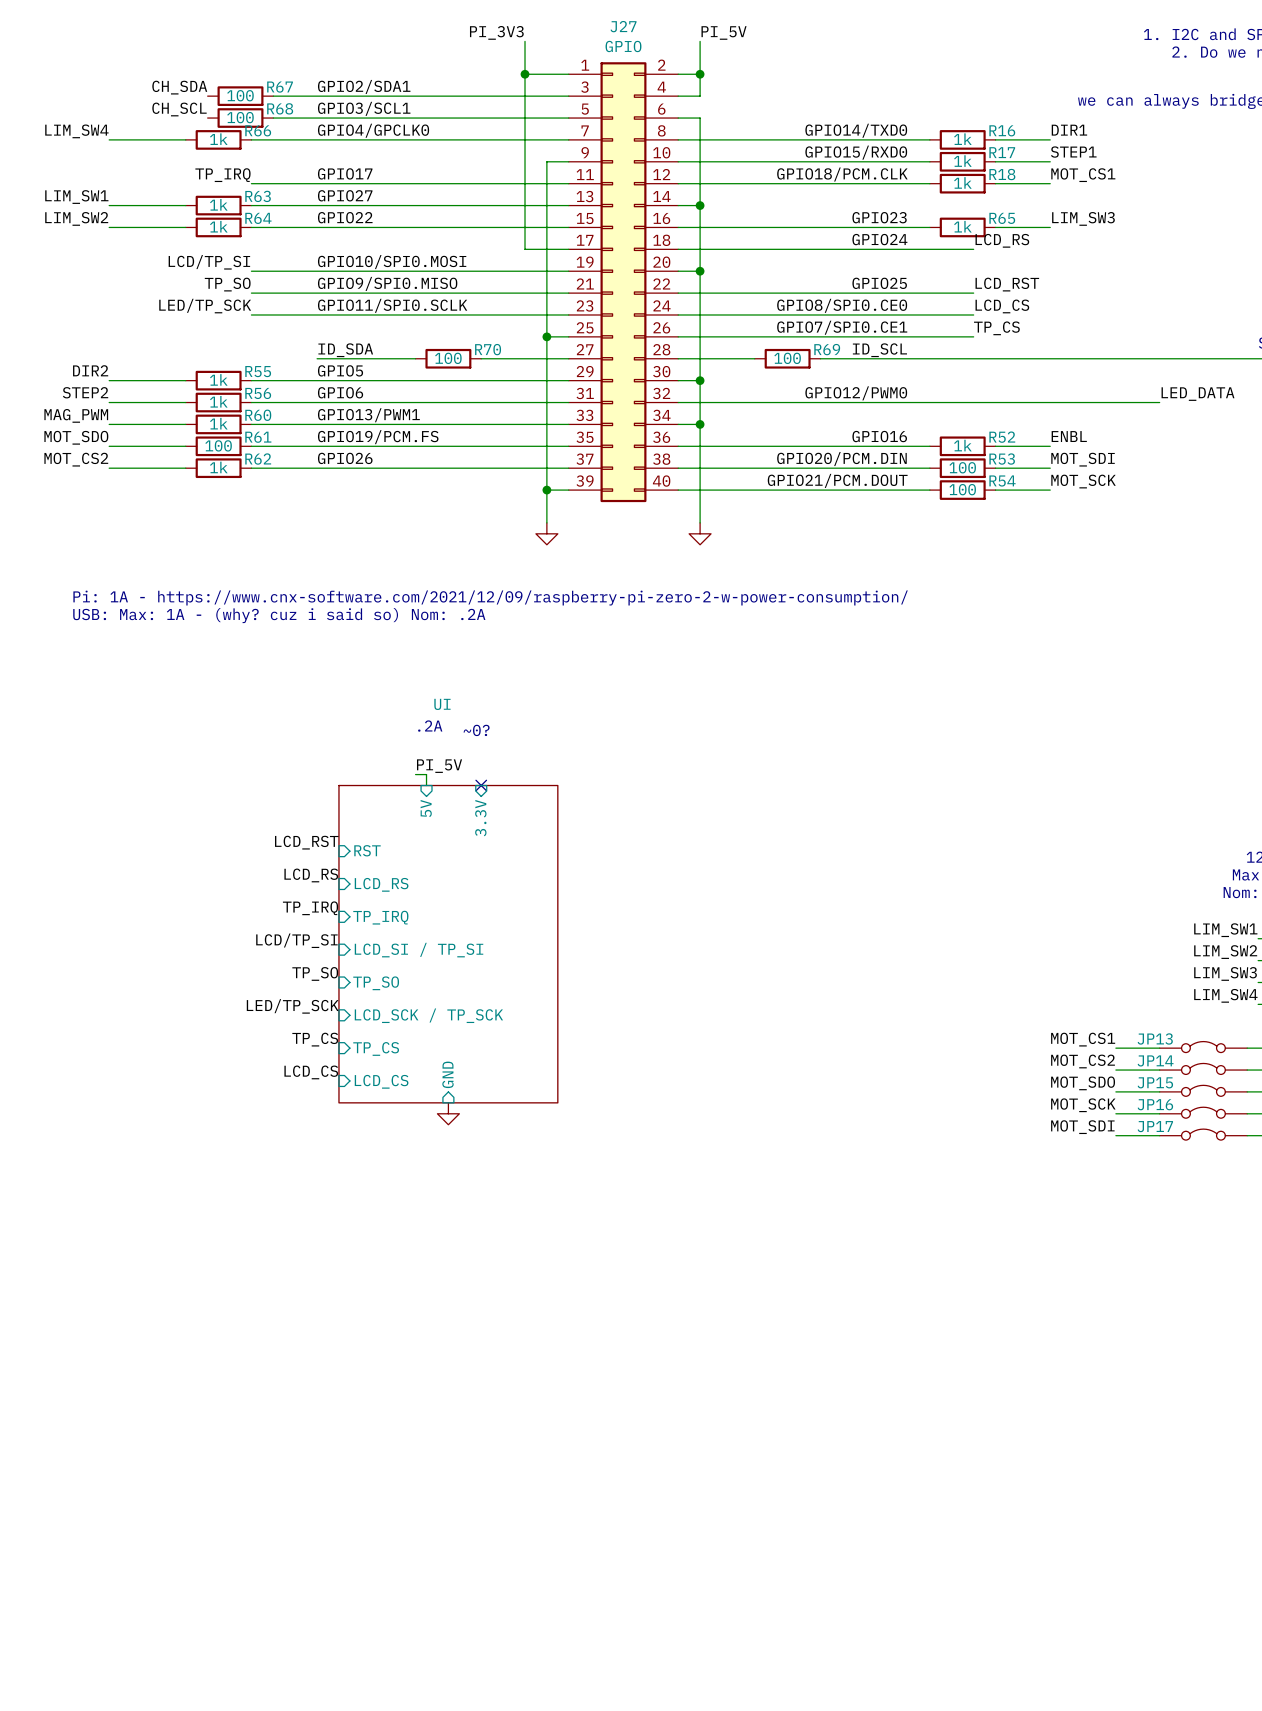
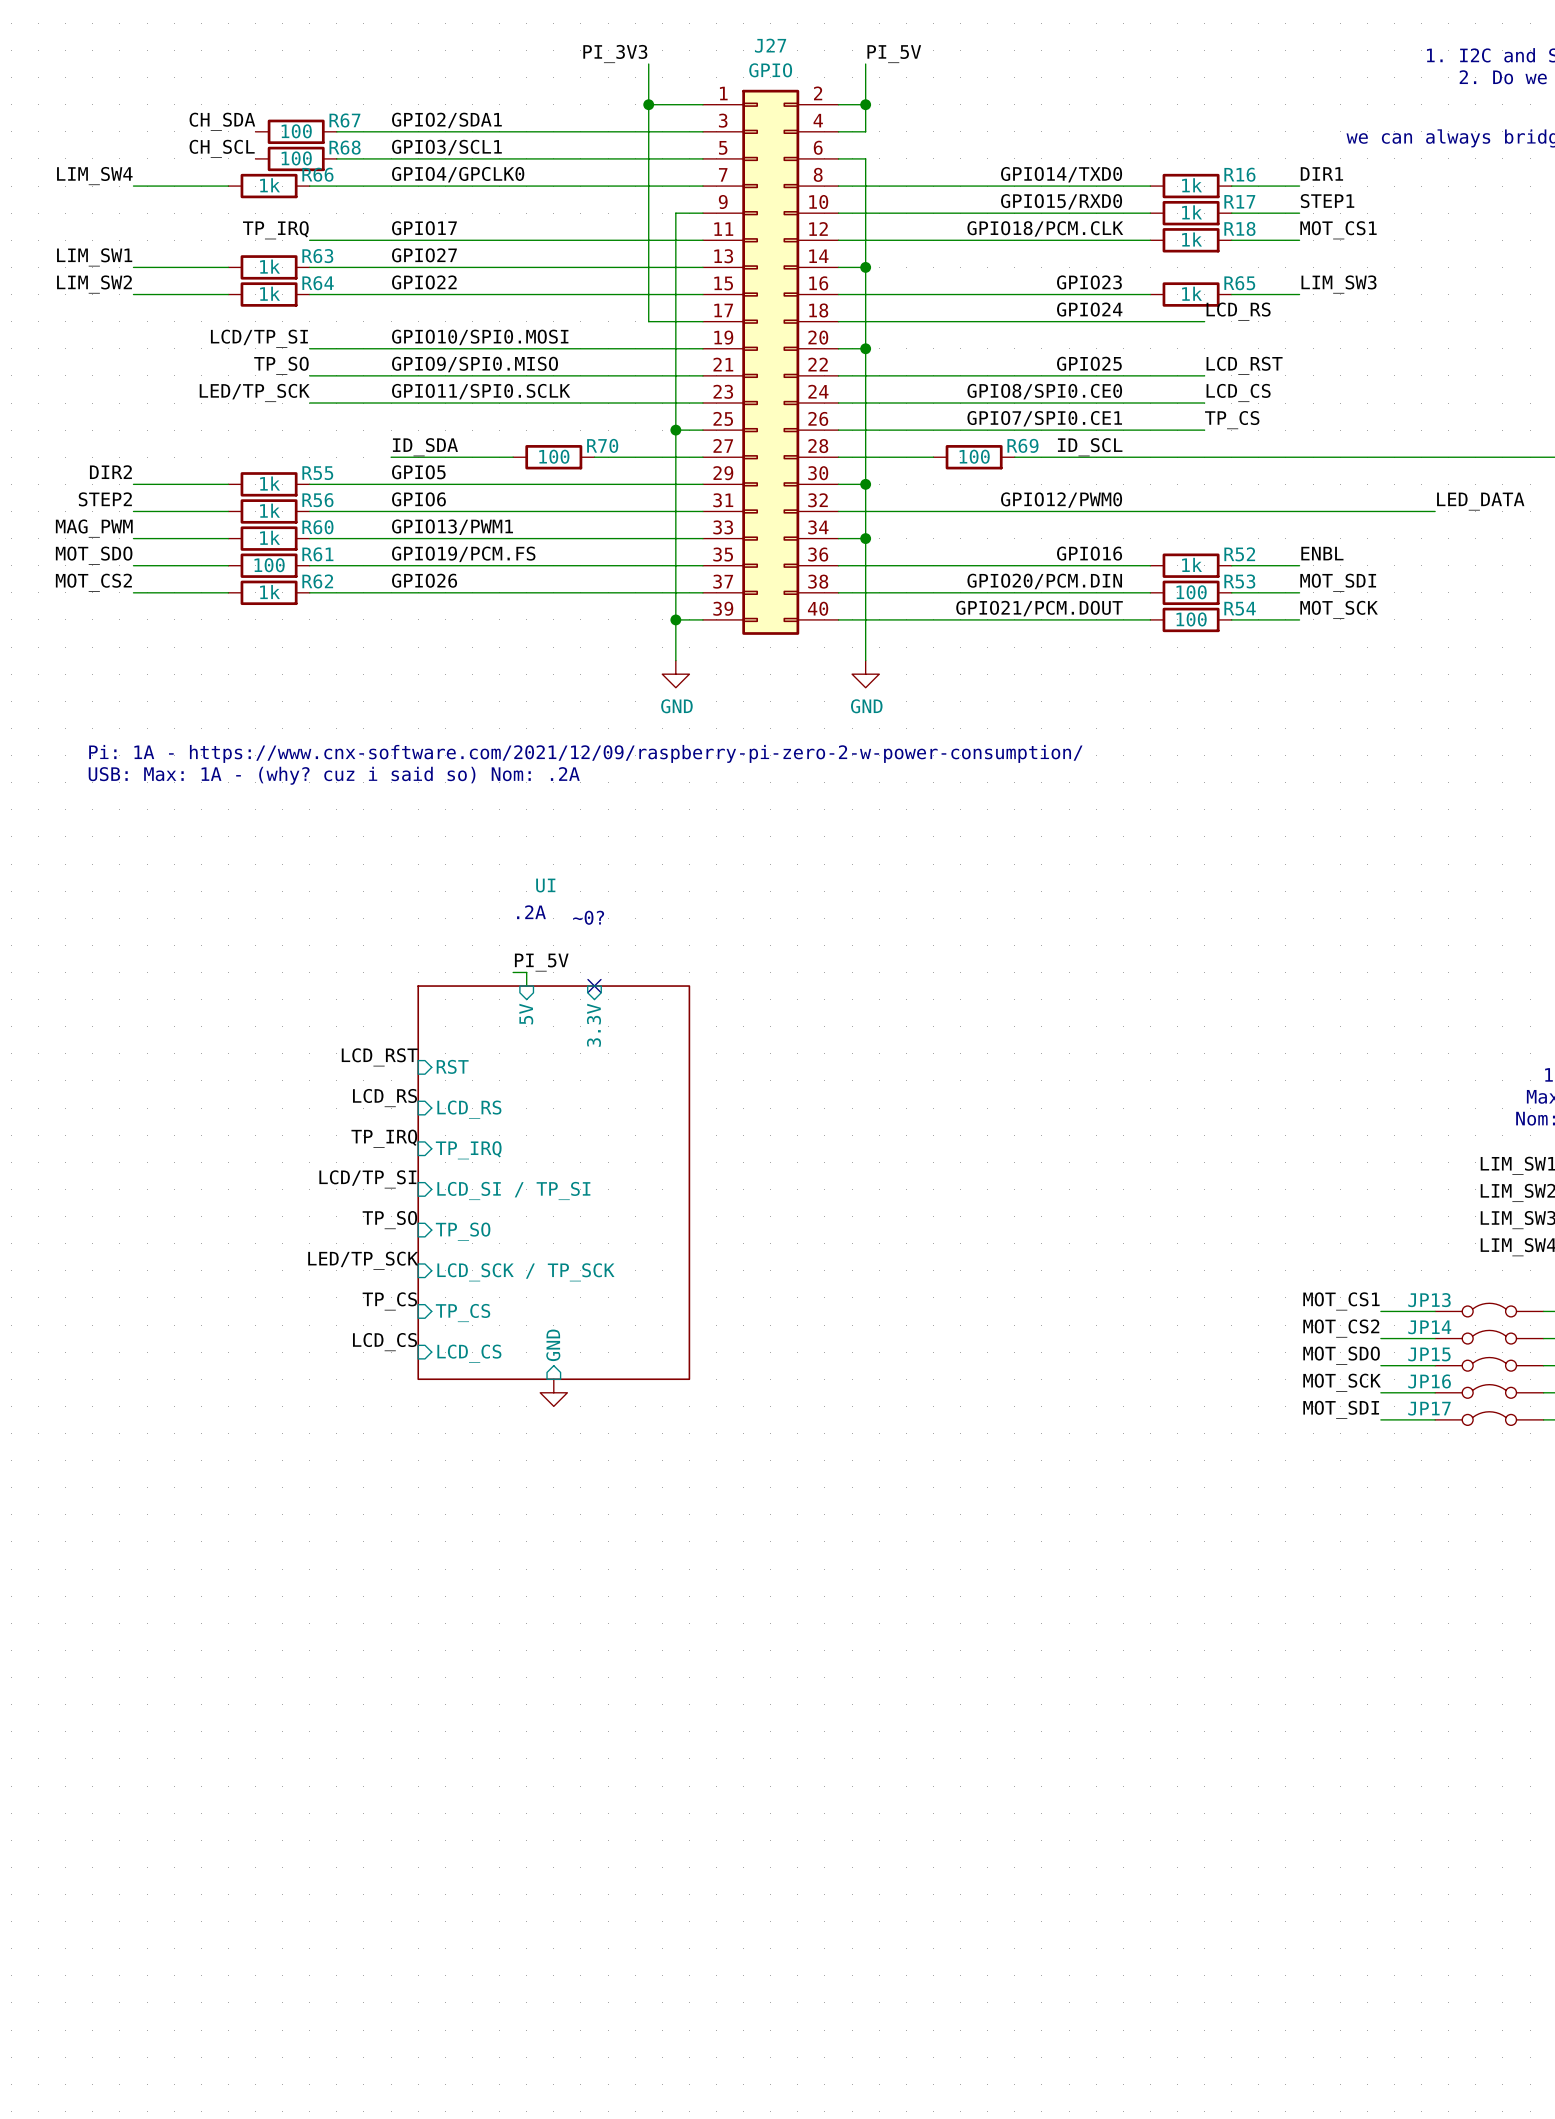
power symbol text: none -> GND (676, 706)
power symbol text: none -> GND (866, 706)

